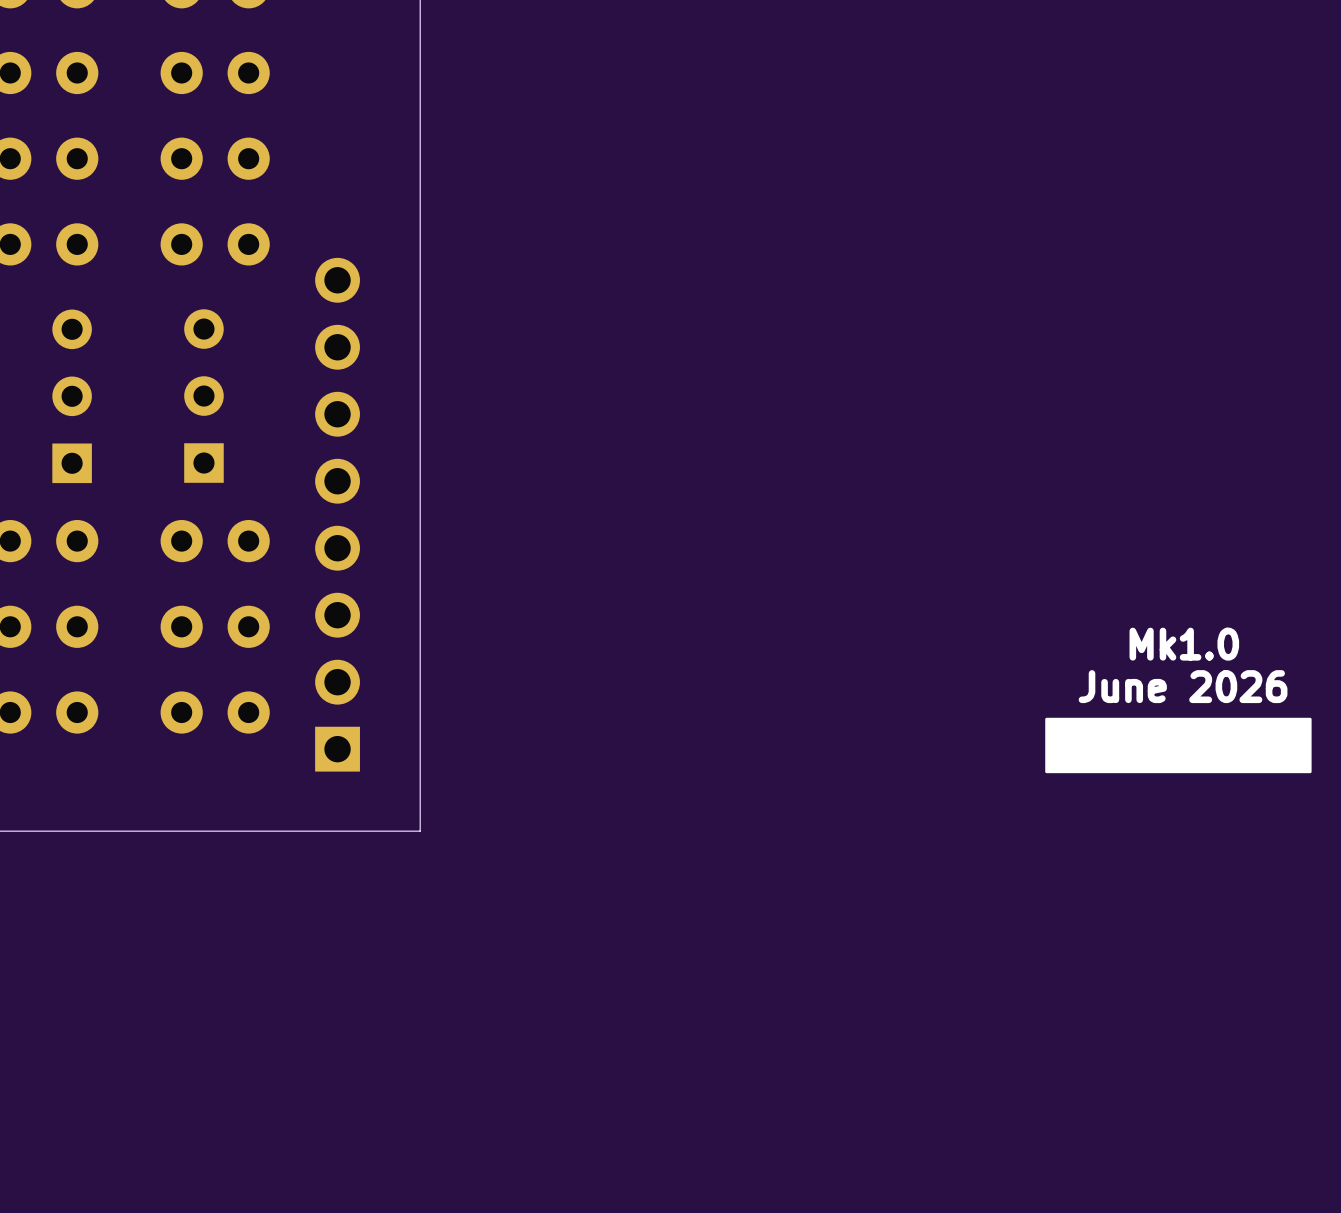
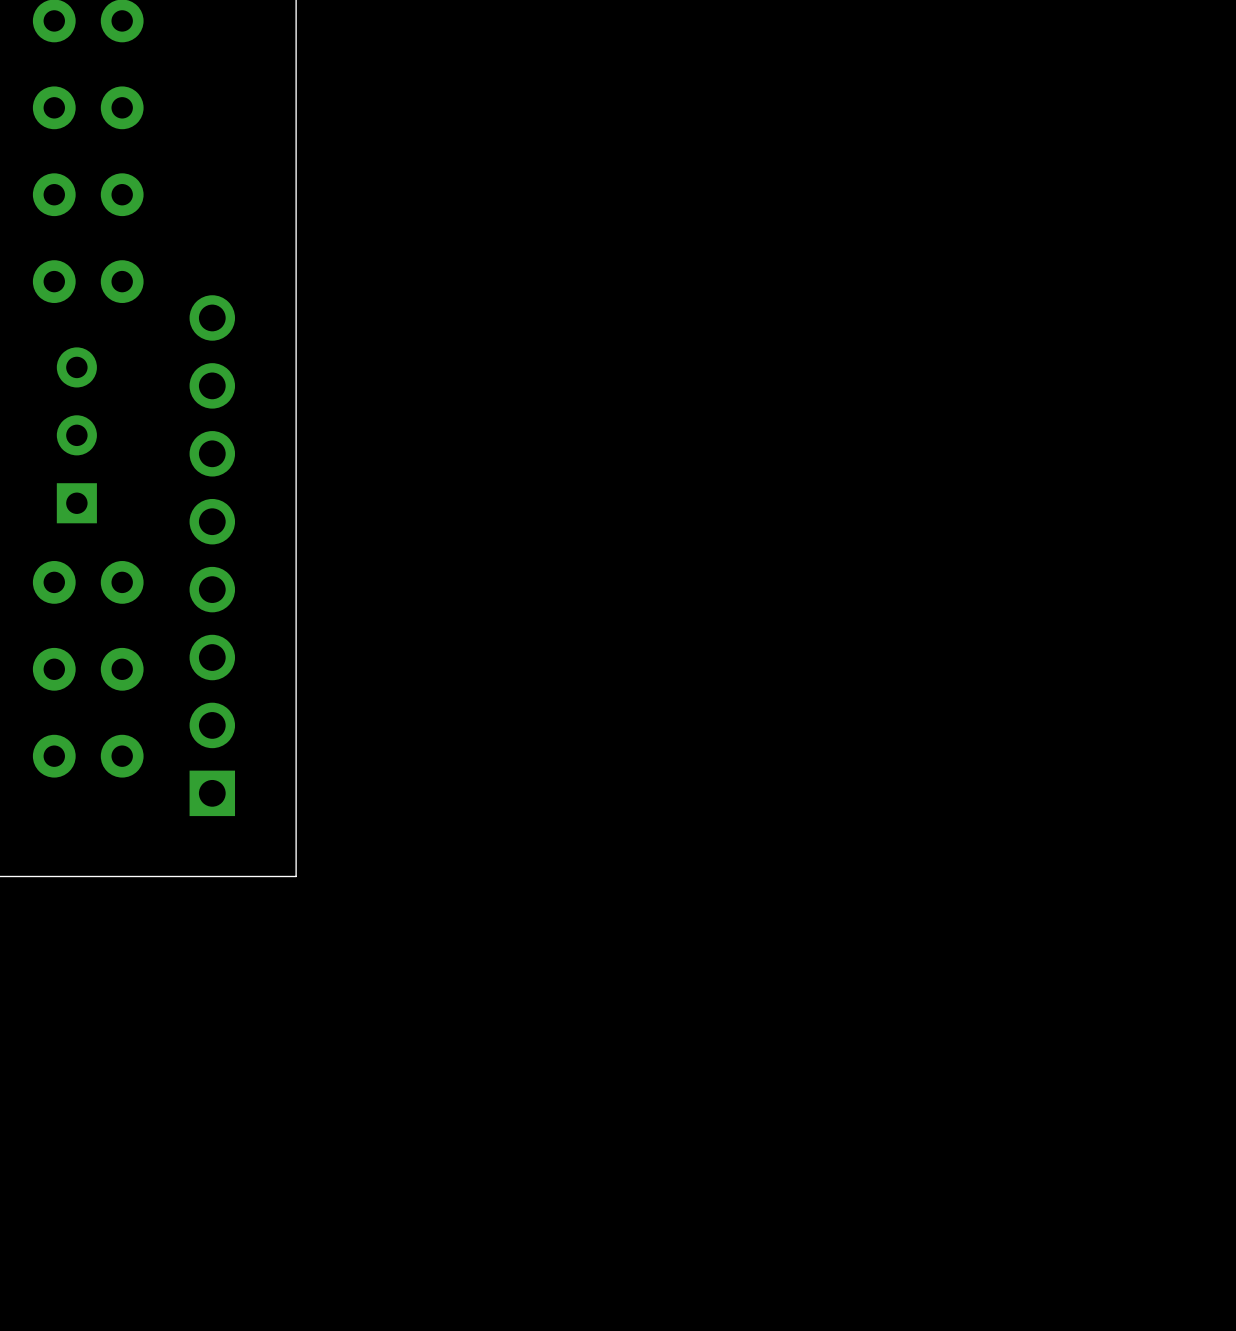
text: Mk1.0 (1184, 644) -> none
text: June 2026 (1183, 686) -> none
drawing: [1045, 717, 1312, 774] -> none

